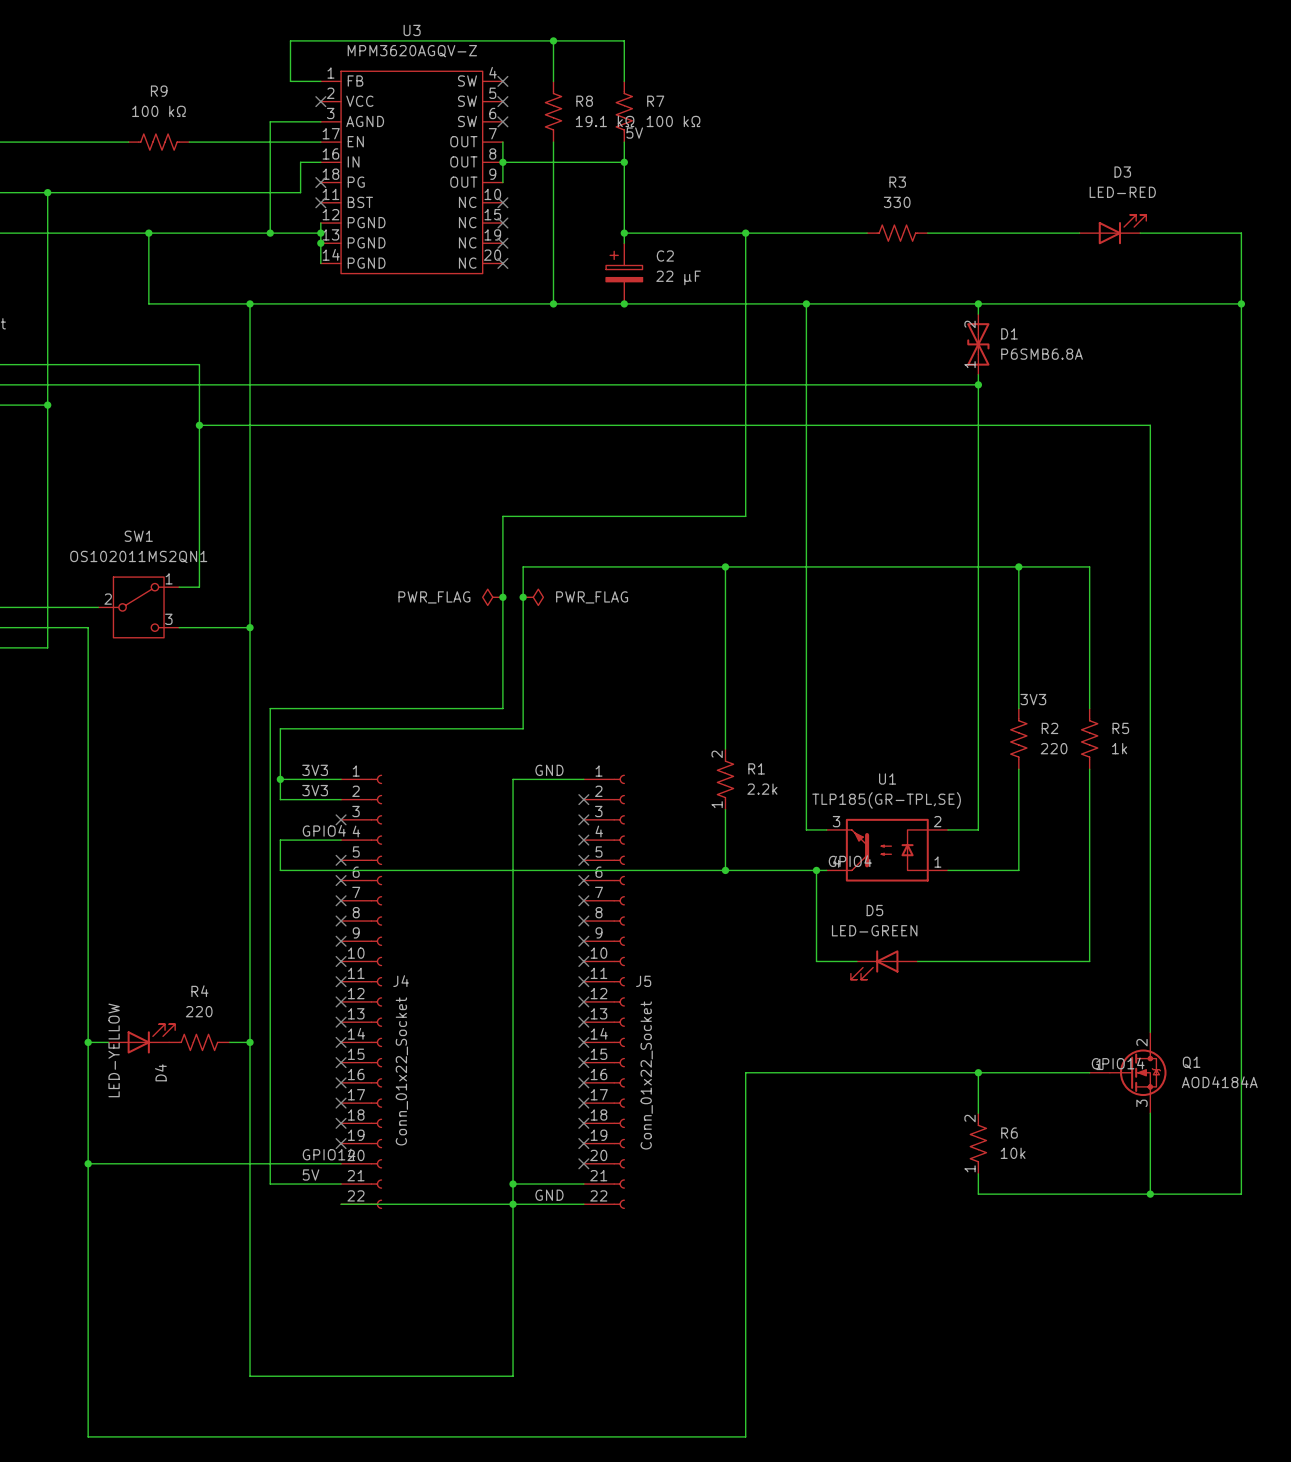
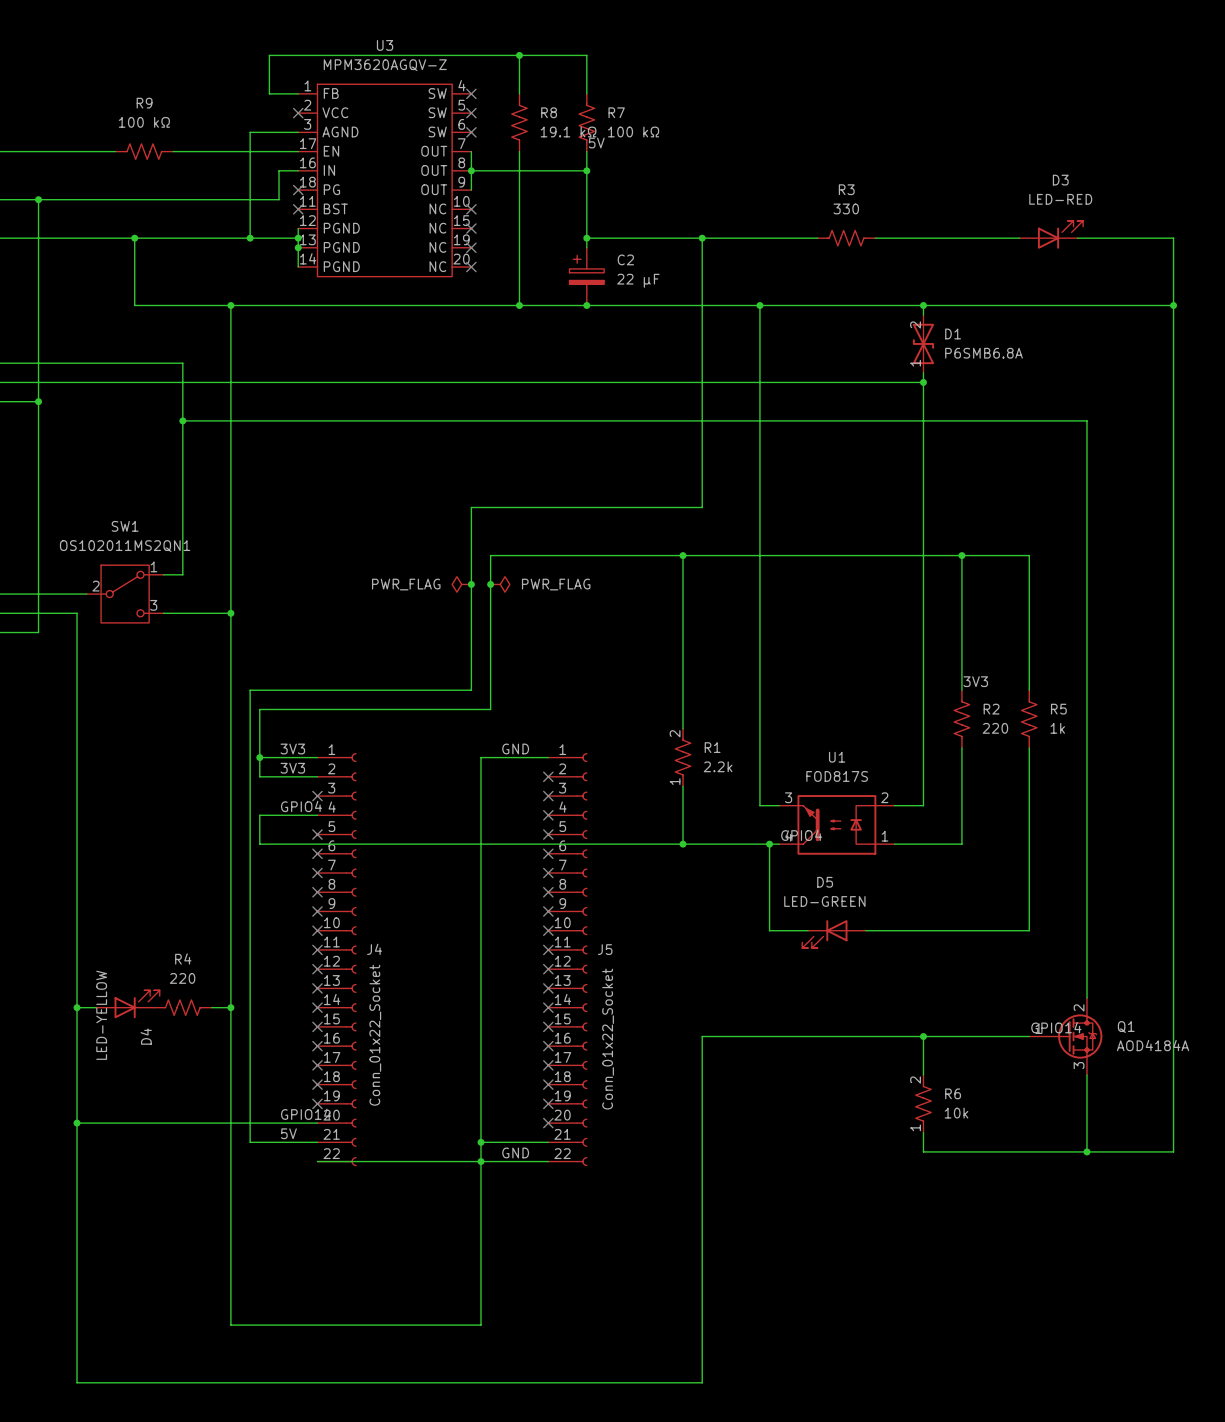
U1 value: TLP185(GR-TPL,SE) (886, 800) -> FOD817S (837, 776)

